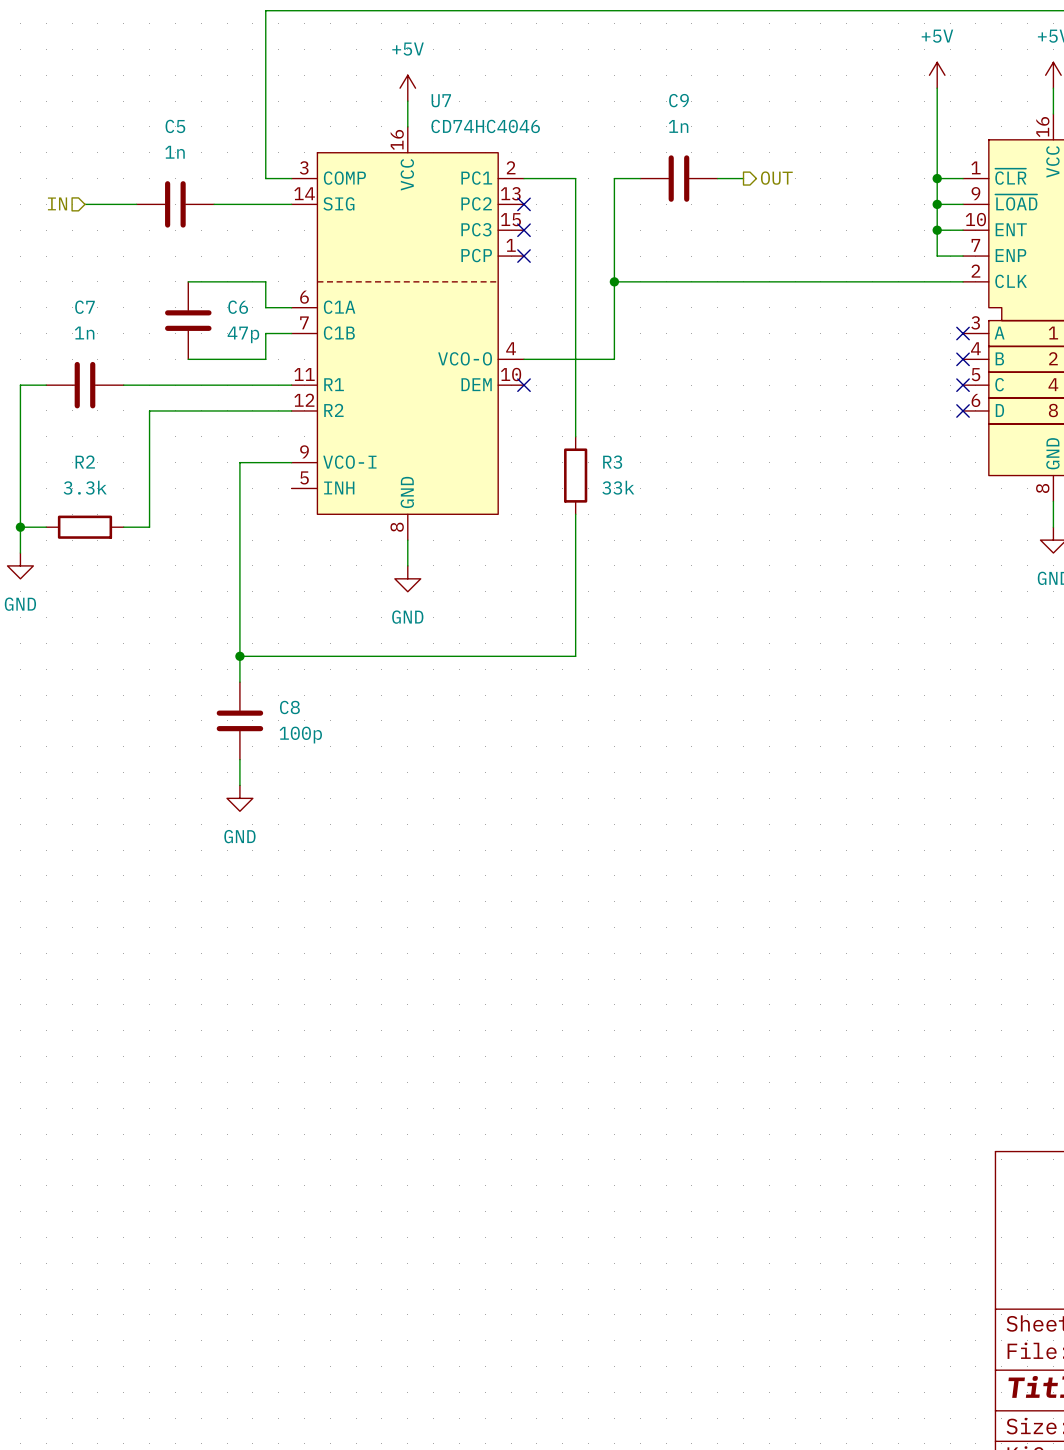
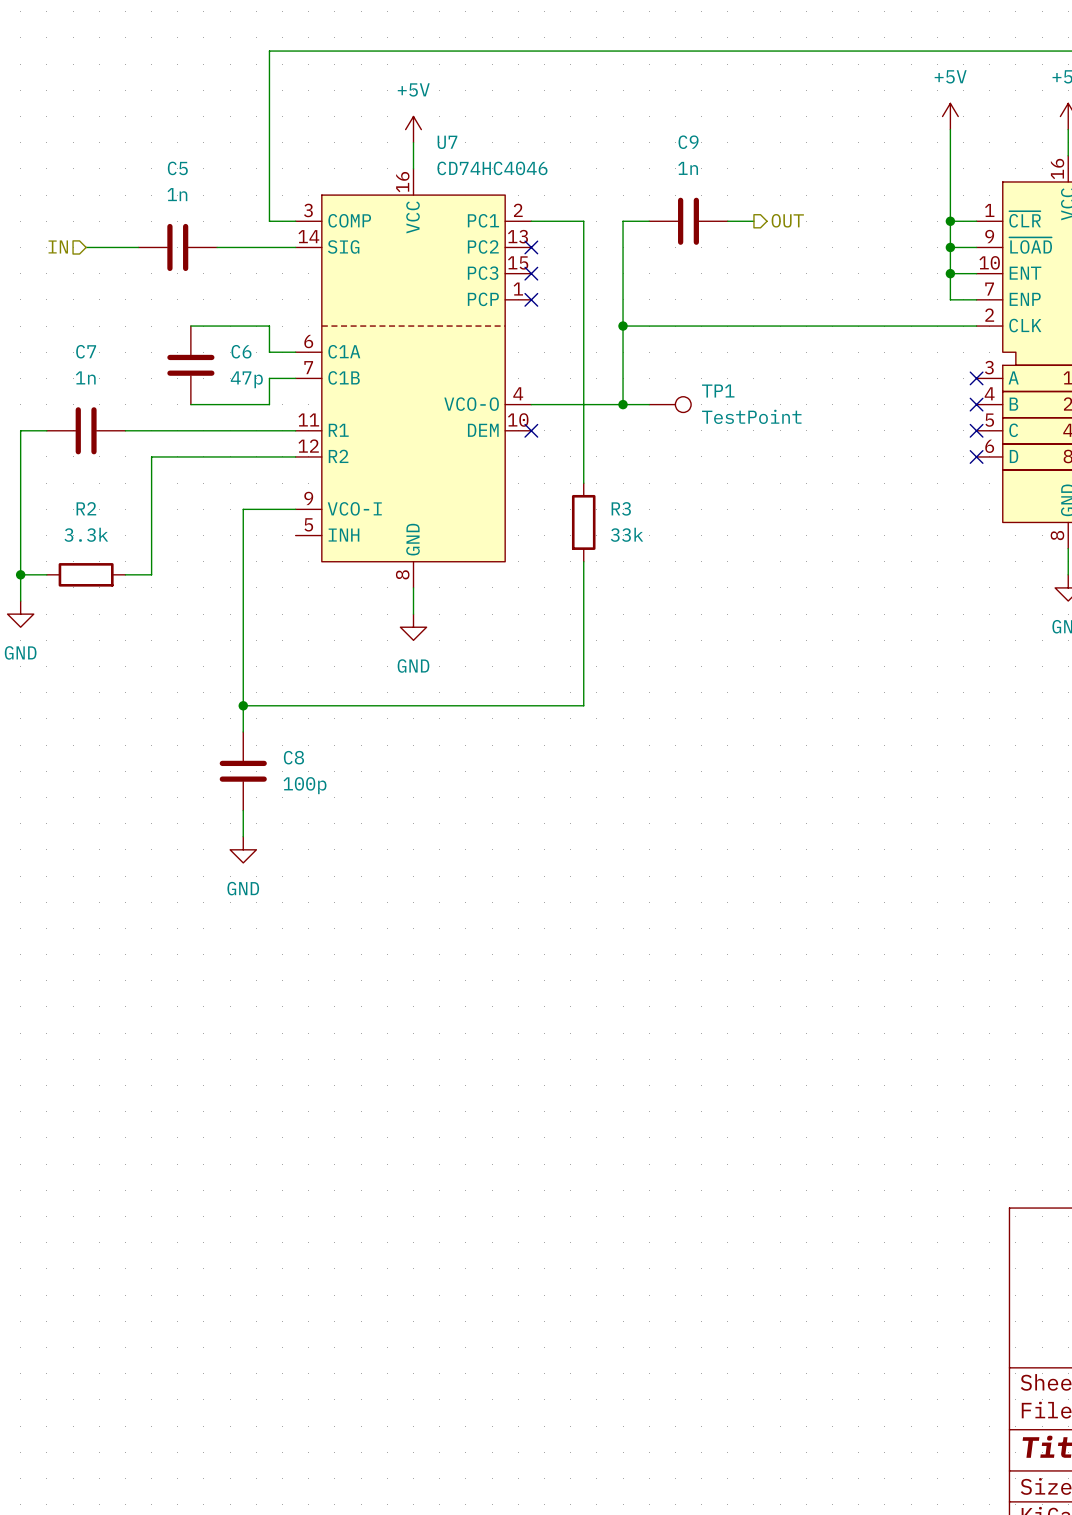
wire: none -> (623, 404) (649, 404)
junction: none -> (623, 404)
TP1: none -> TestPoint (670, 404)

